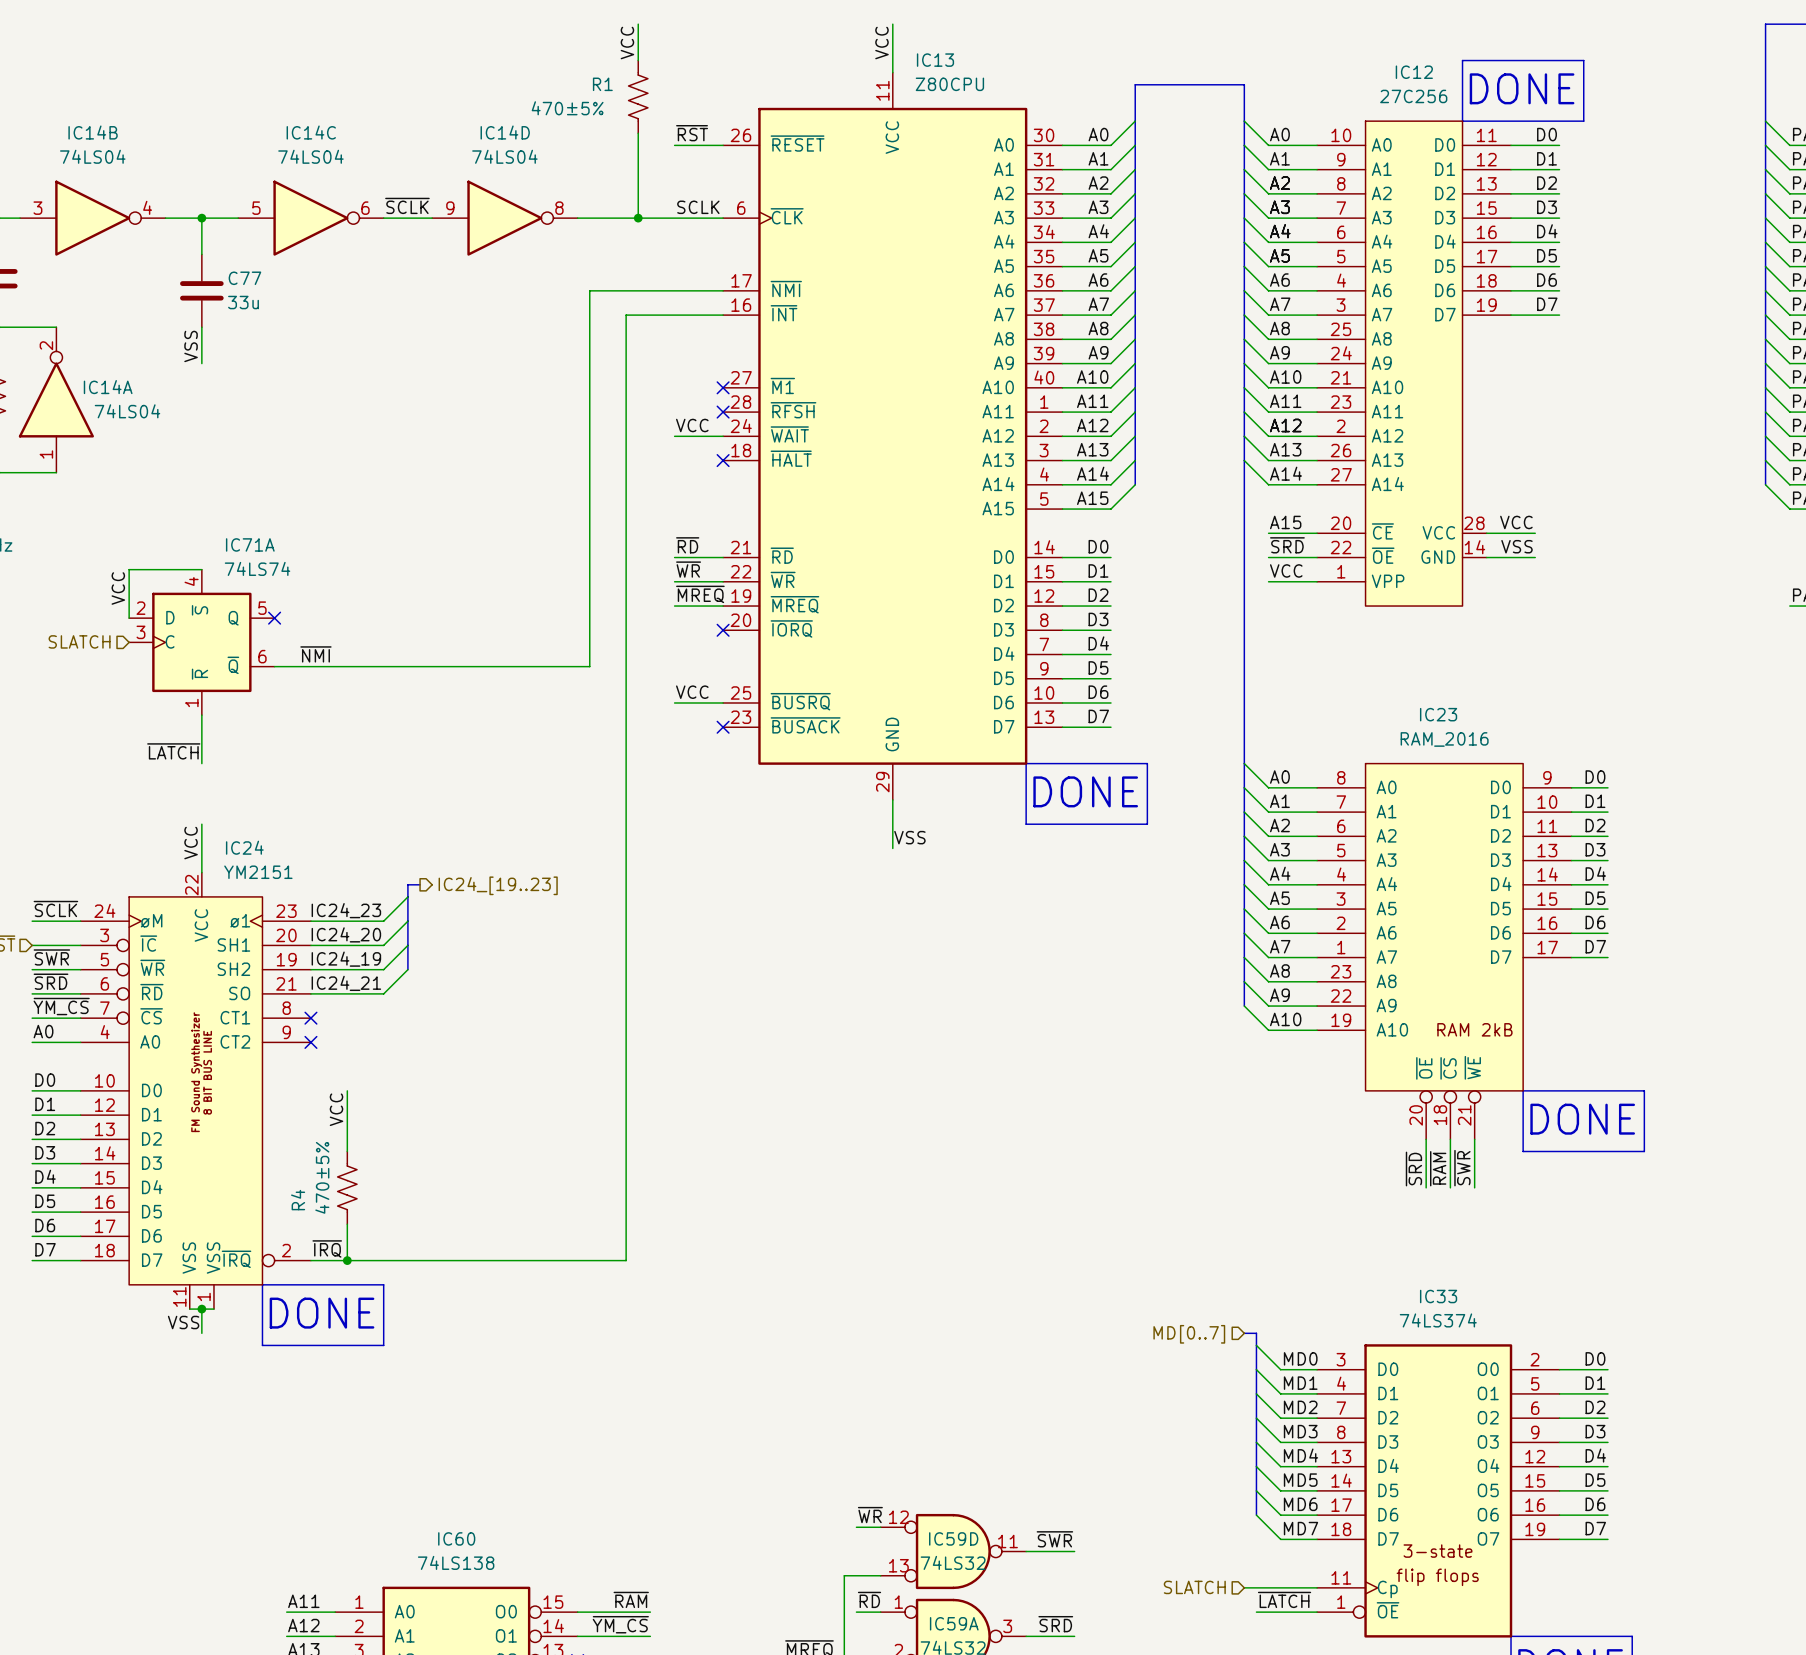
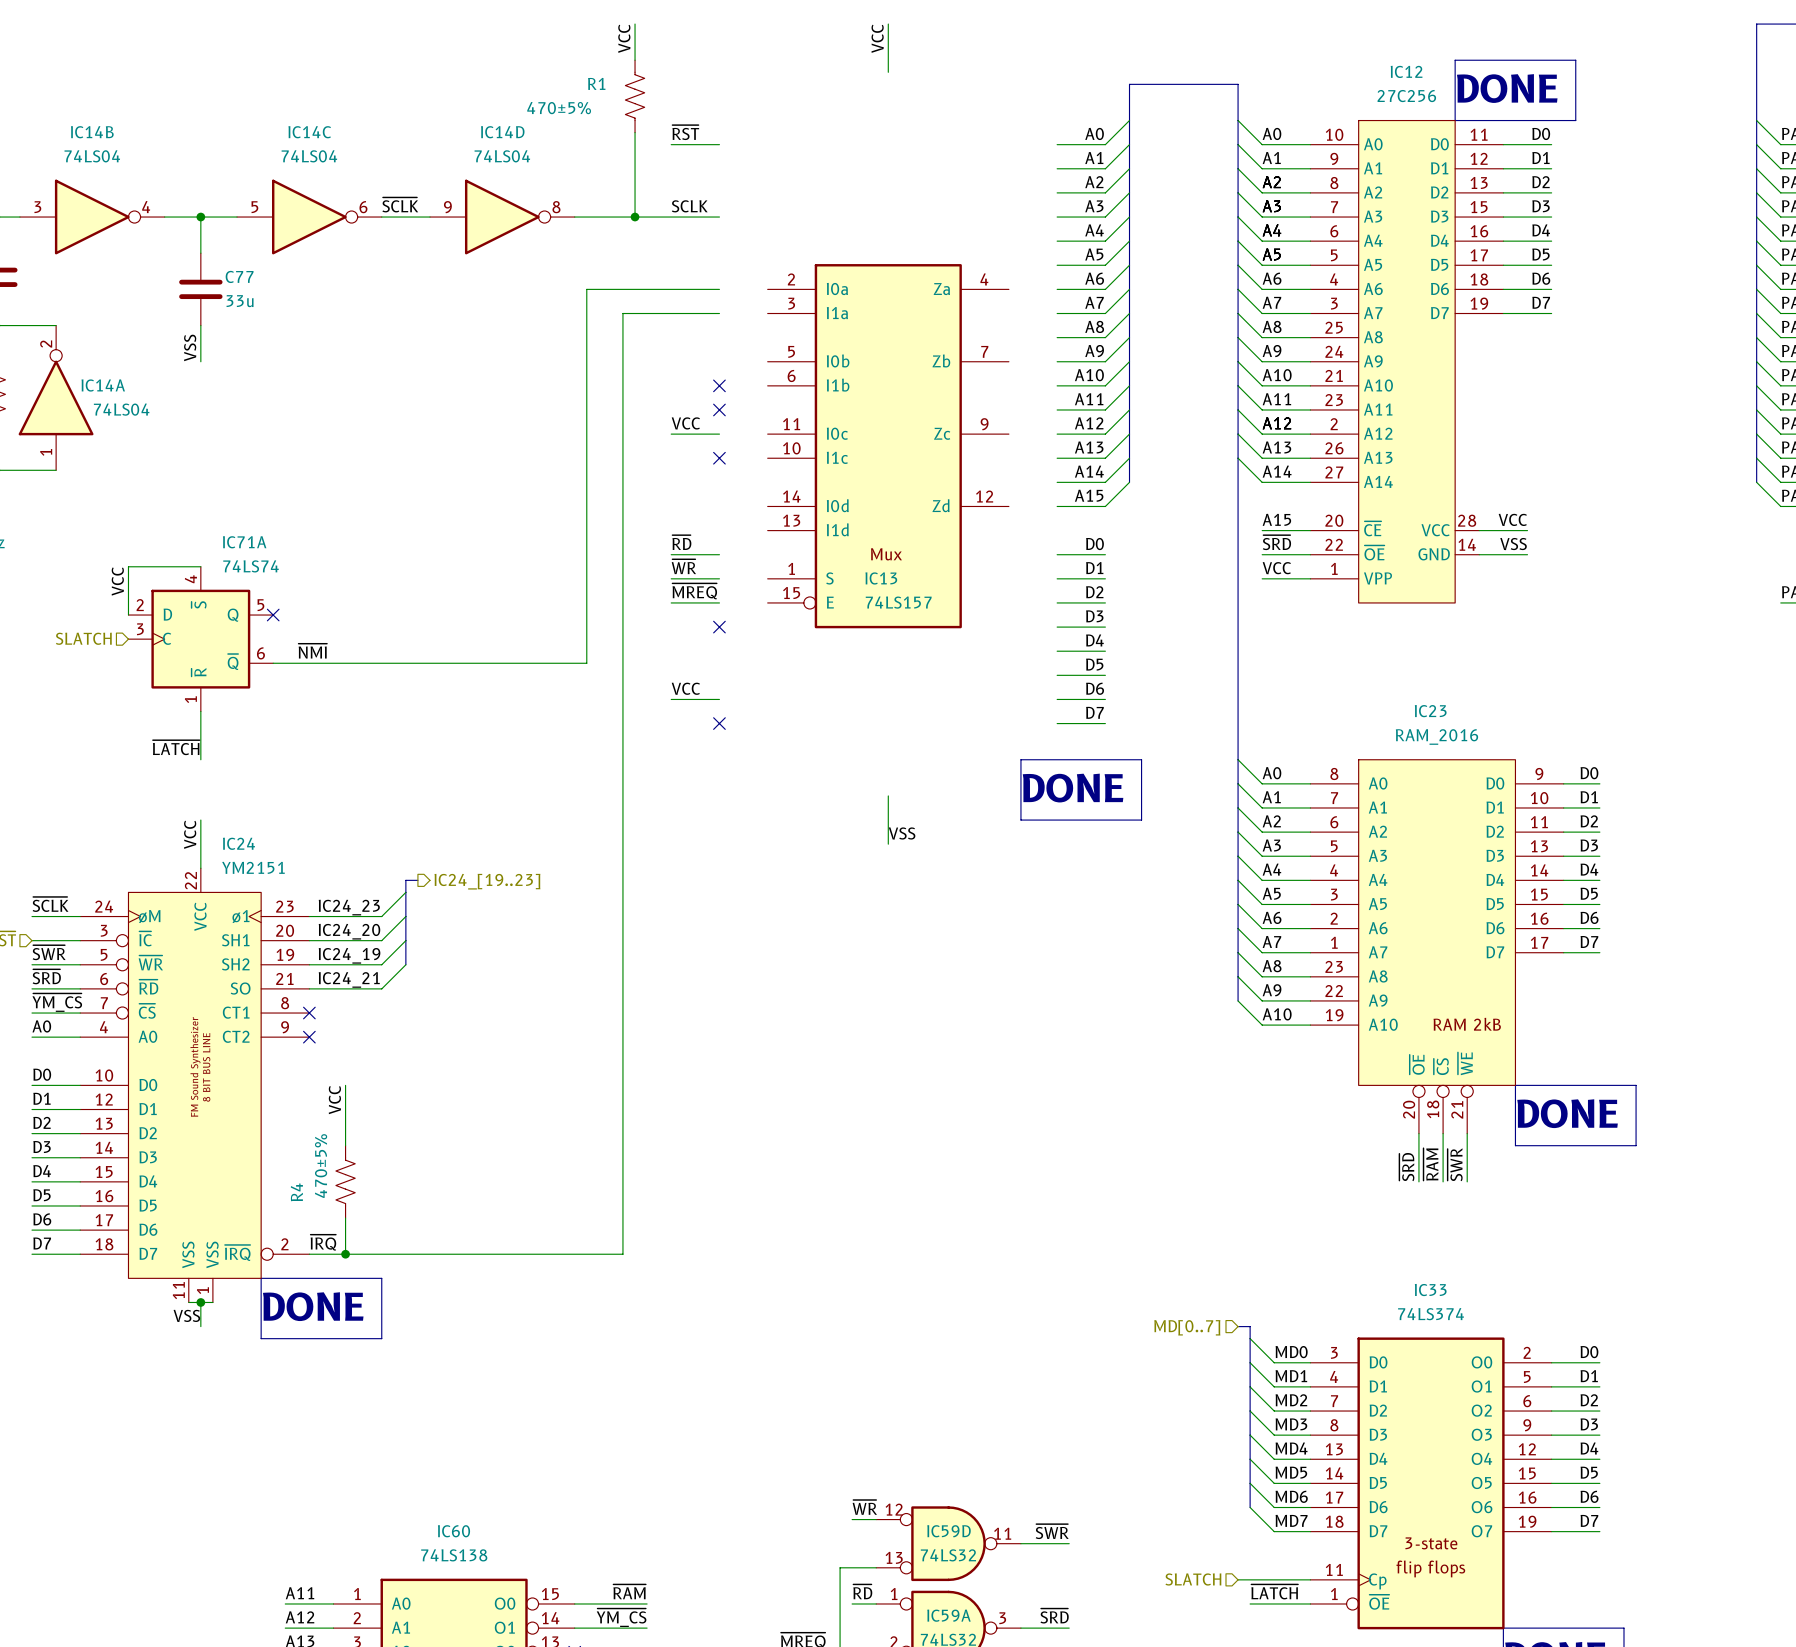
IC13 name position: IC13 (935, 60) -> IC13 (881, 578)
IC13 symbol: [723, 72, 1063, 800] -> [767, 264, 1009, 629]
IC13 value: Z80CPU (949, 84) -> 74LS157 (898, 602)

